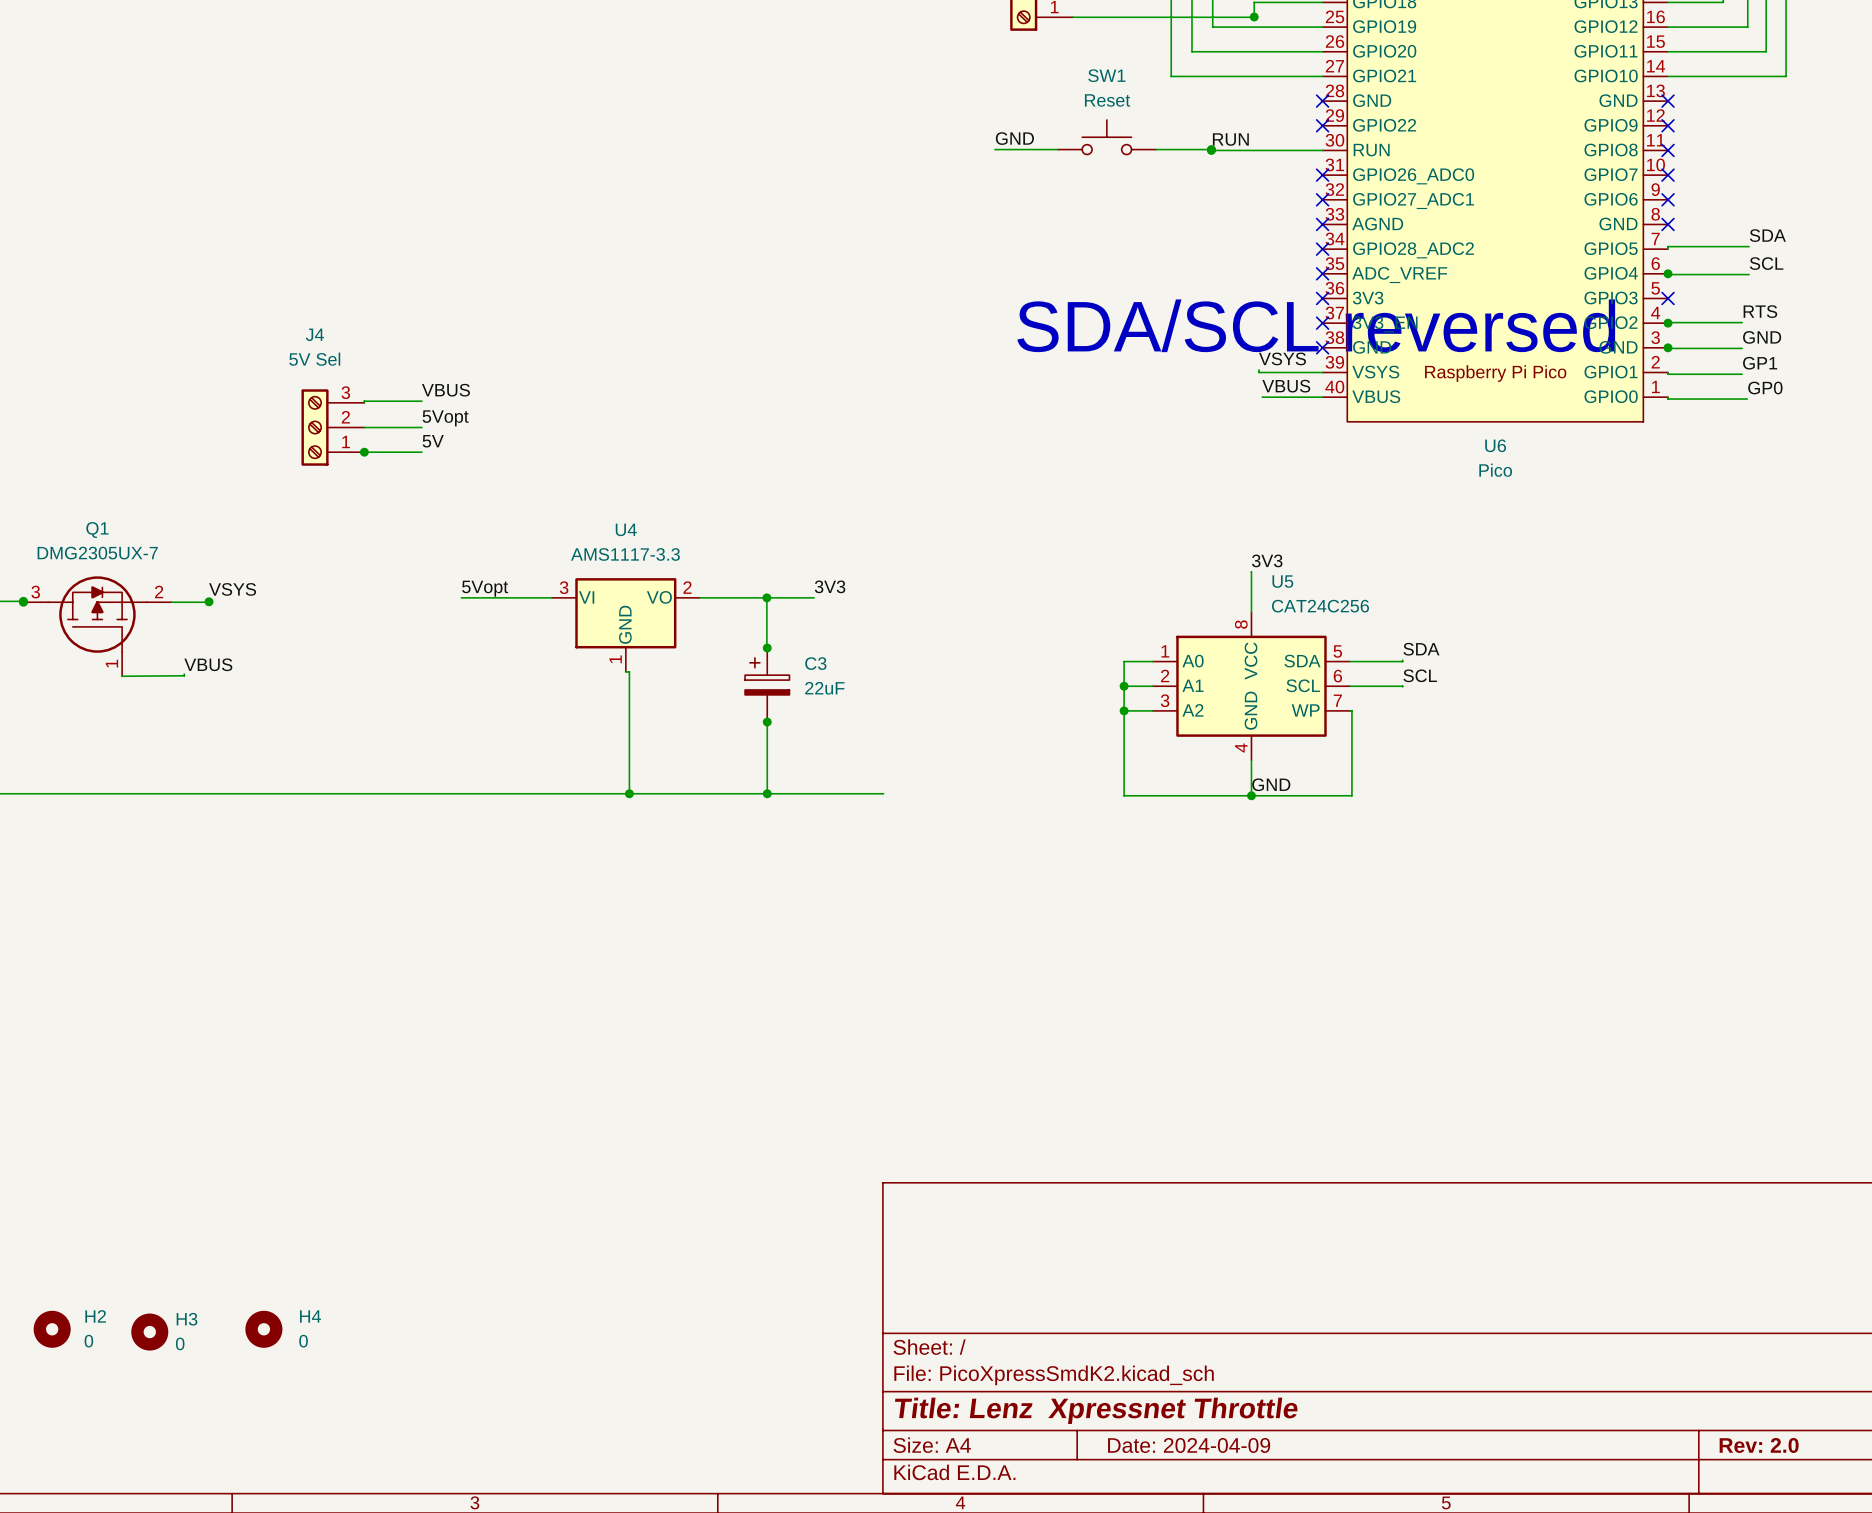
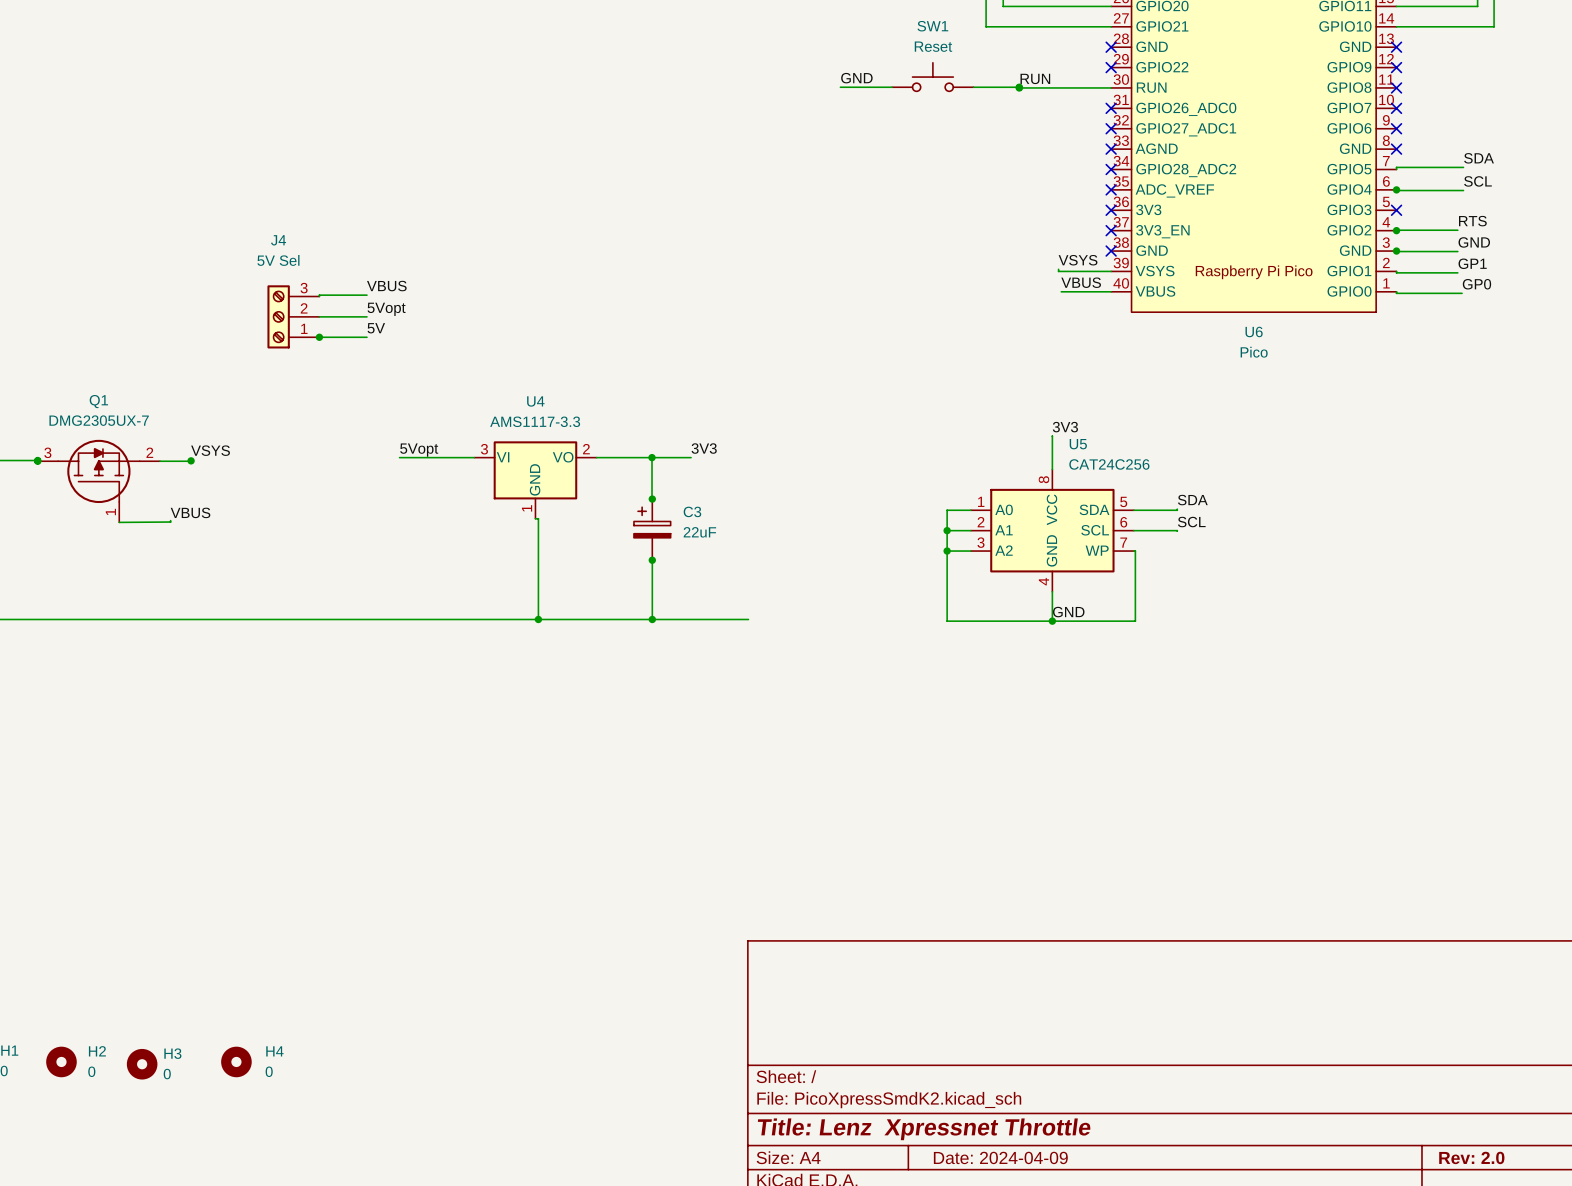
text: SDA/SCL reversed (1316, 325) -> none

